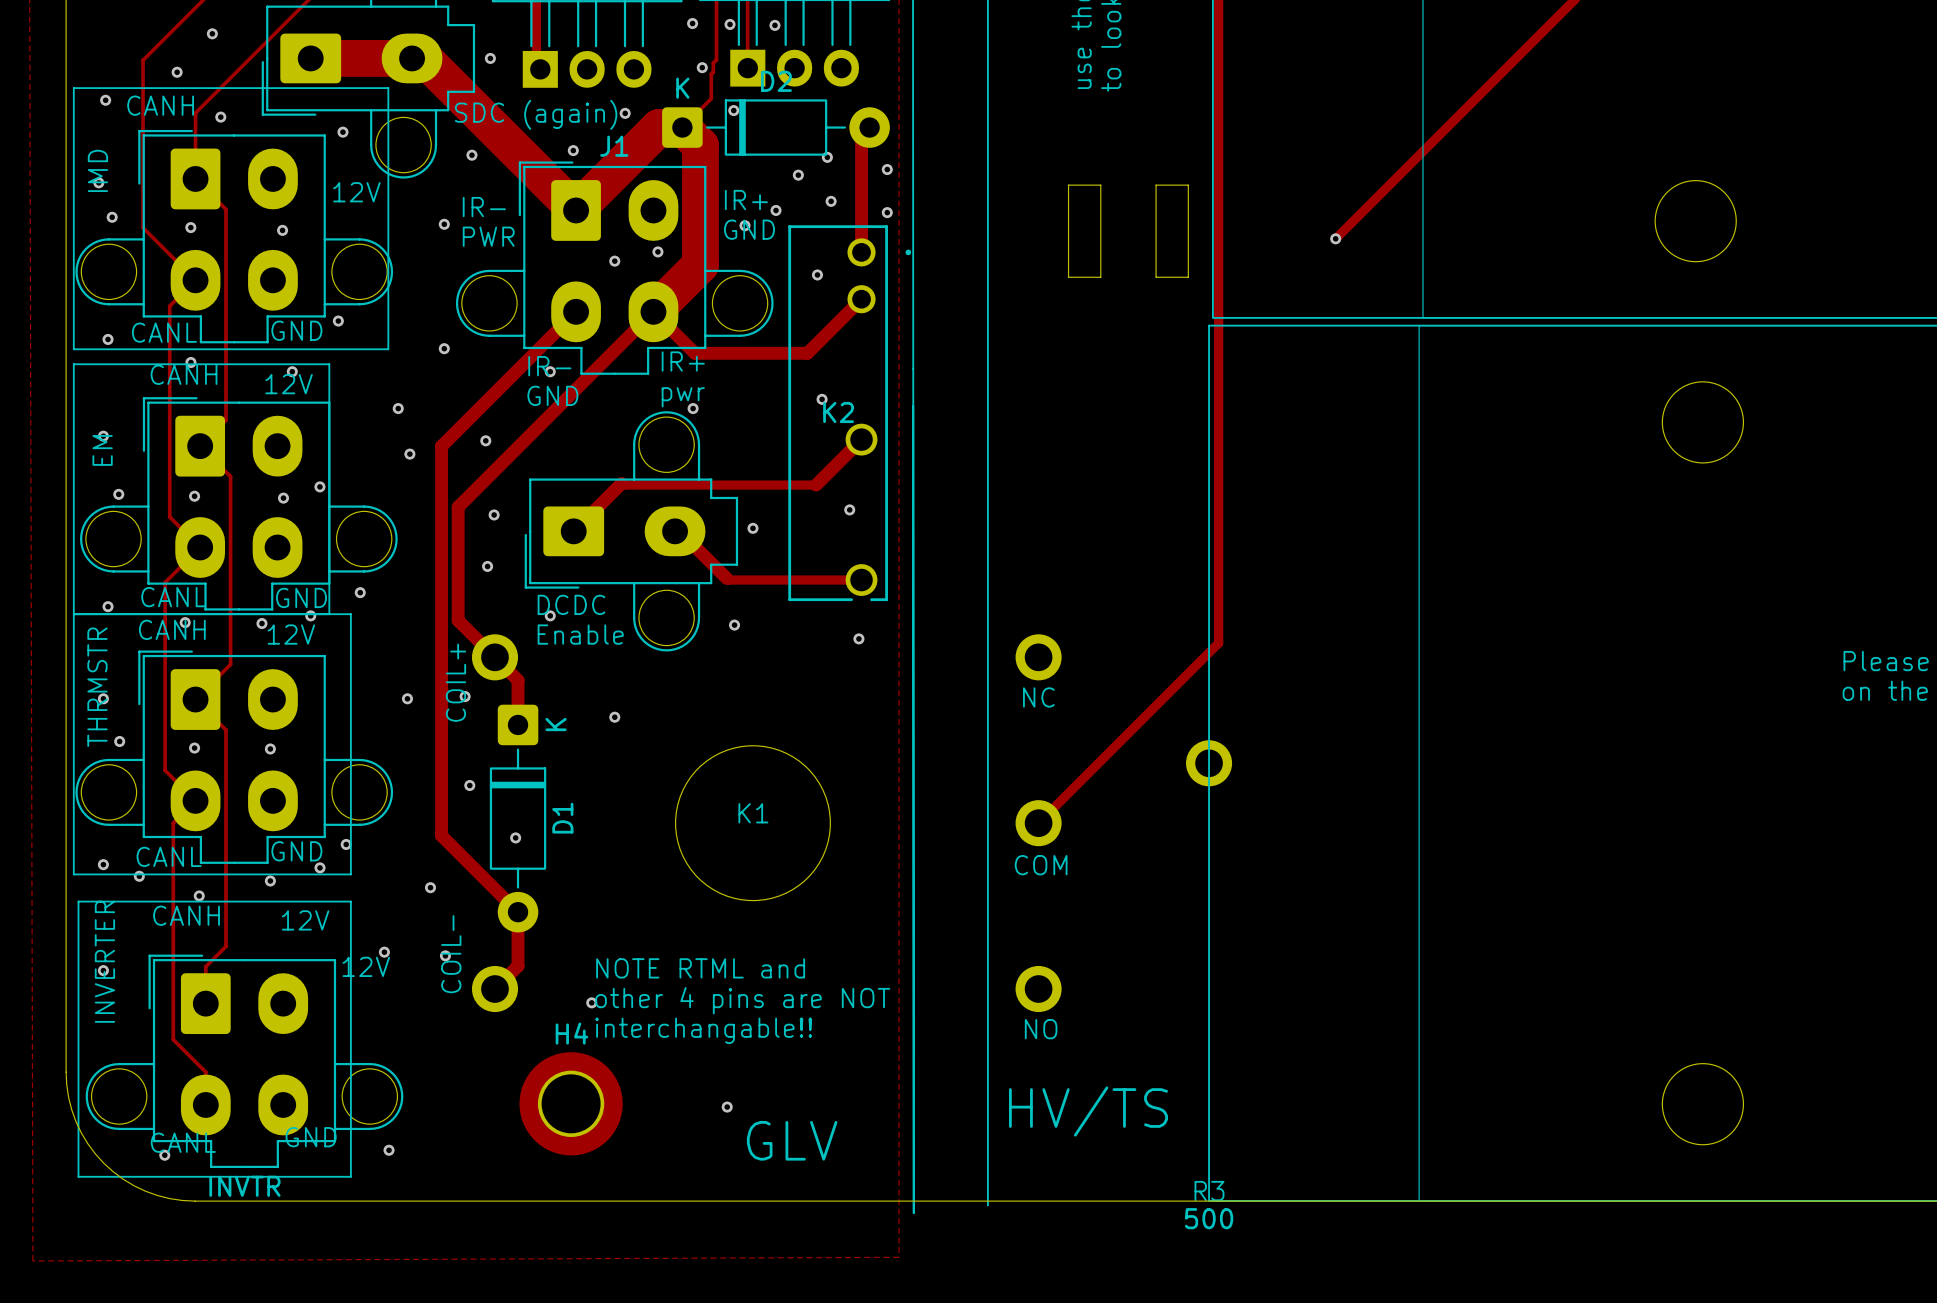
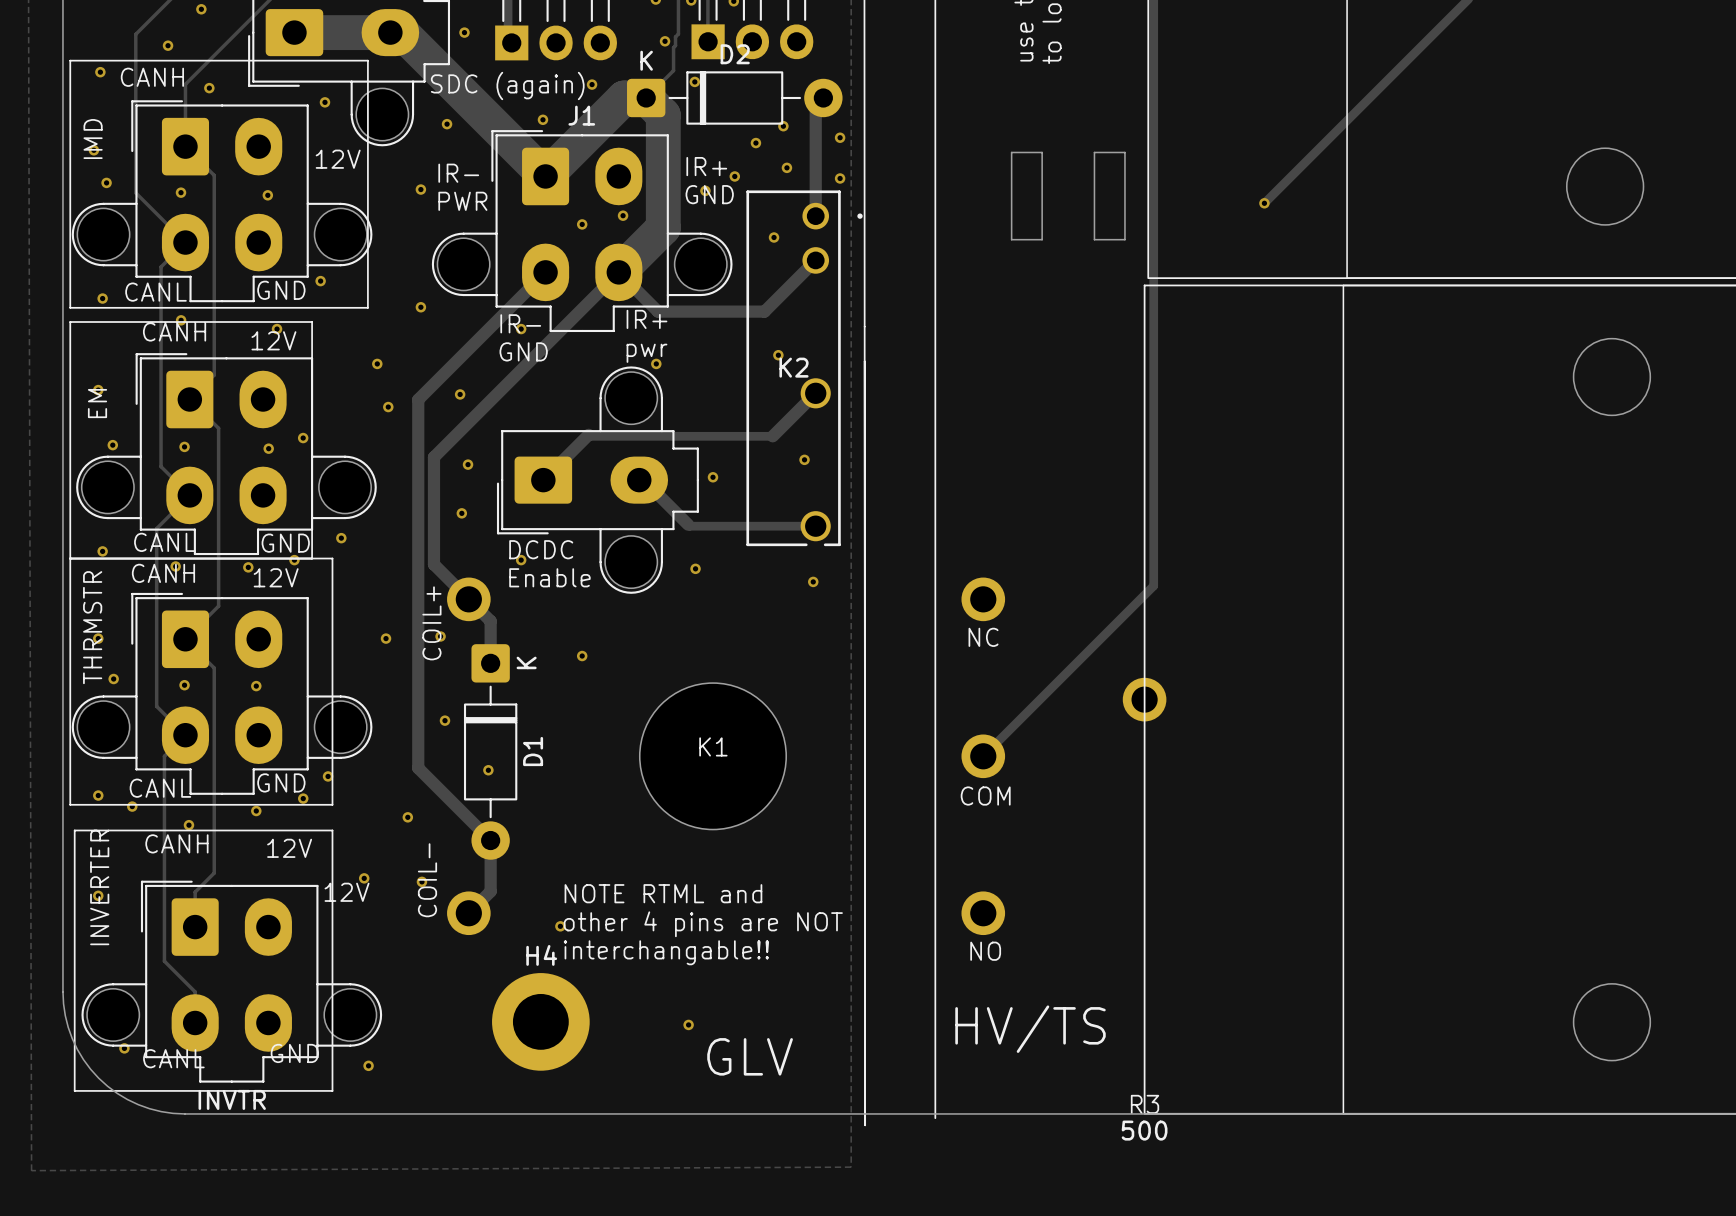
via position: (164, 1155) -> (124, 1048)

